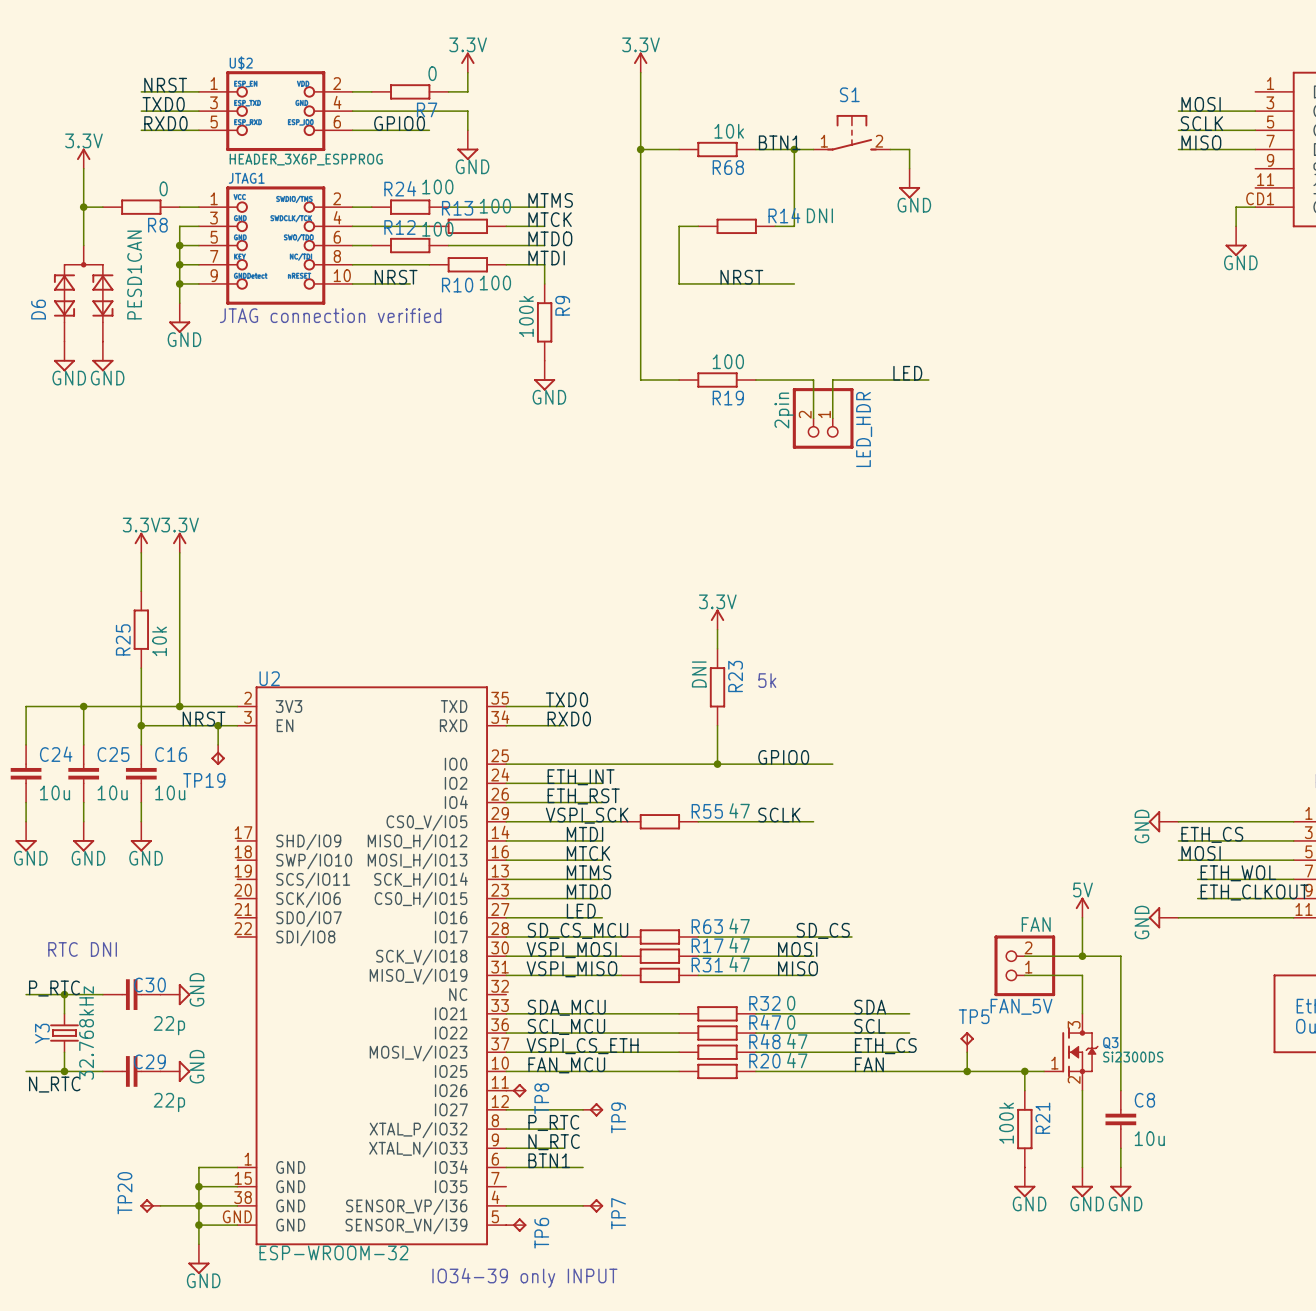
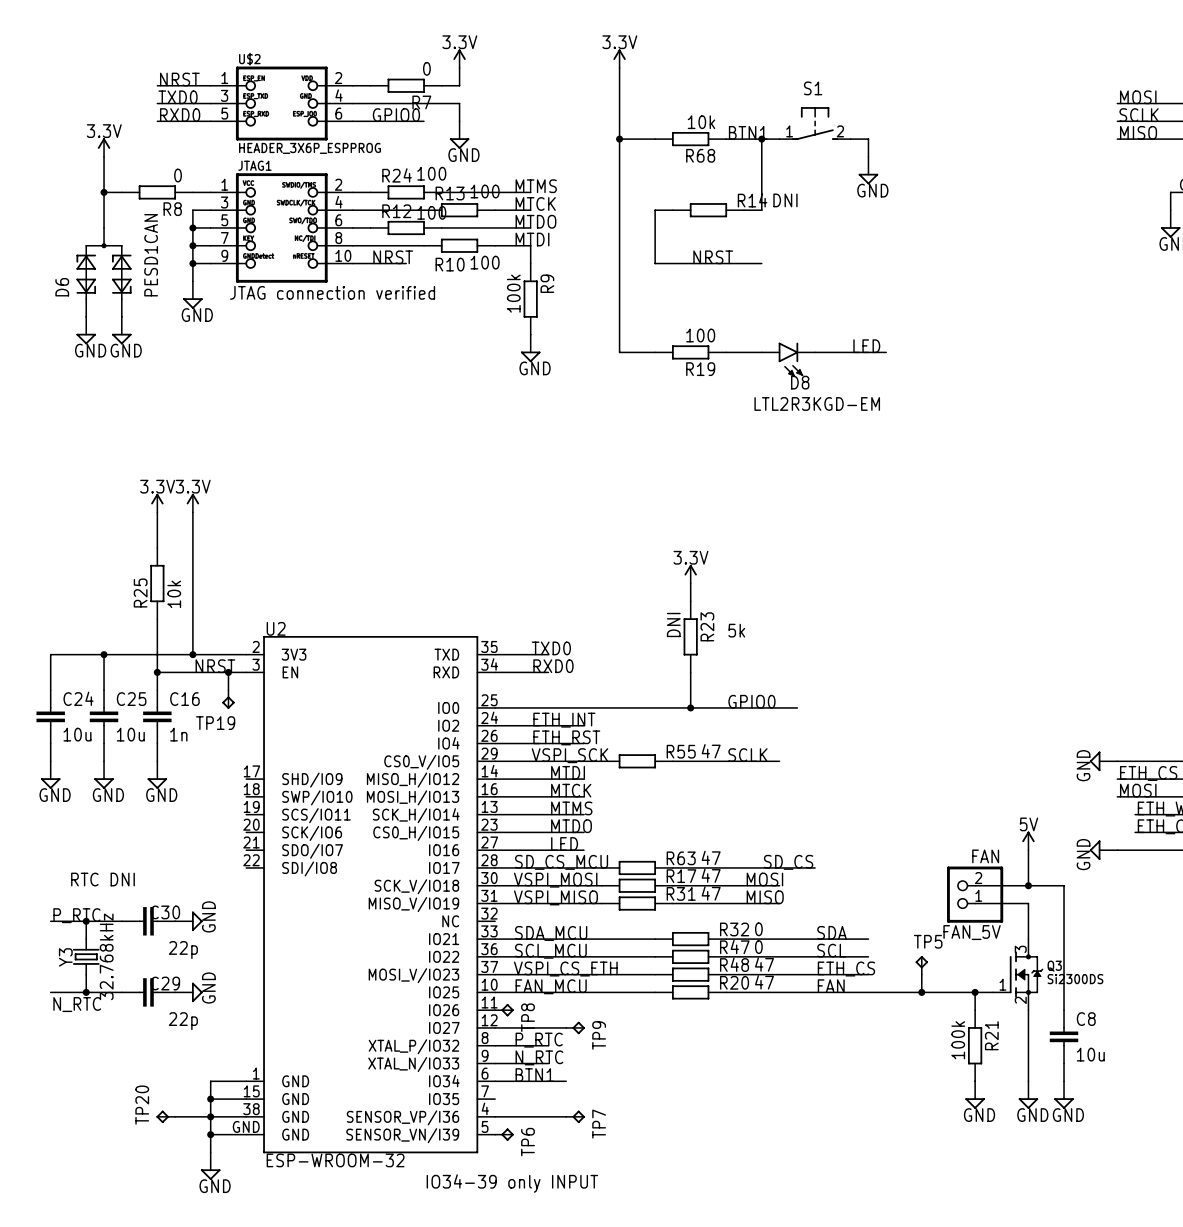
wire: (794, 380) (813, 380) (813, 418) -> none
D8: none -> LTL2R3KGD-EM (788, 359)
LED_HDR: 2pin (823, 418) -> none
C16 value: 10u (170, 792) -> 1n (178, 734)

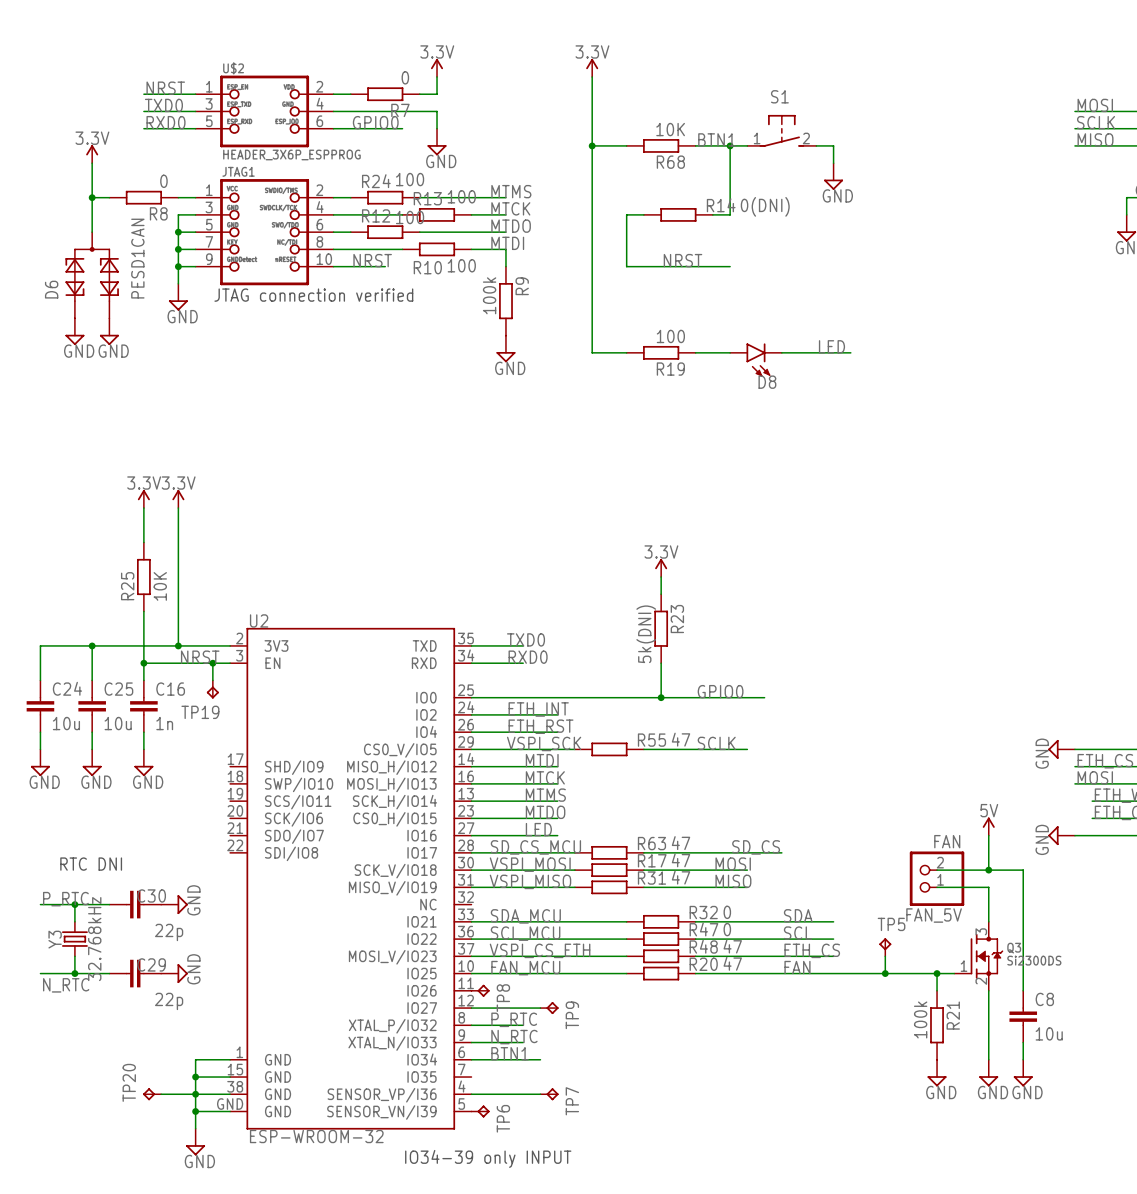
R68 value: 10k (701, 122) -> 10K (670, 129)
R14 value: DNI (785, 200) -> 0(DNI) (765, 206)
D8 value: LTL2R3KGD-EM (817, 403) -> none
R25 value: 10k (174, 594) -> 10K (160, 586)
R23 value: DNI (673, 624) -> 5k(DNI) (646, 634)
text: 5k (736, 630) -> none

